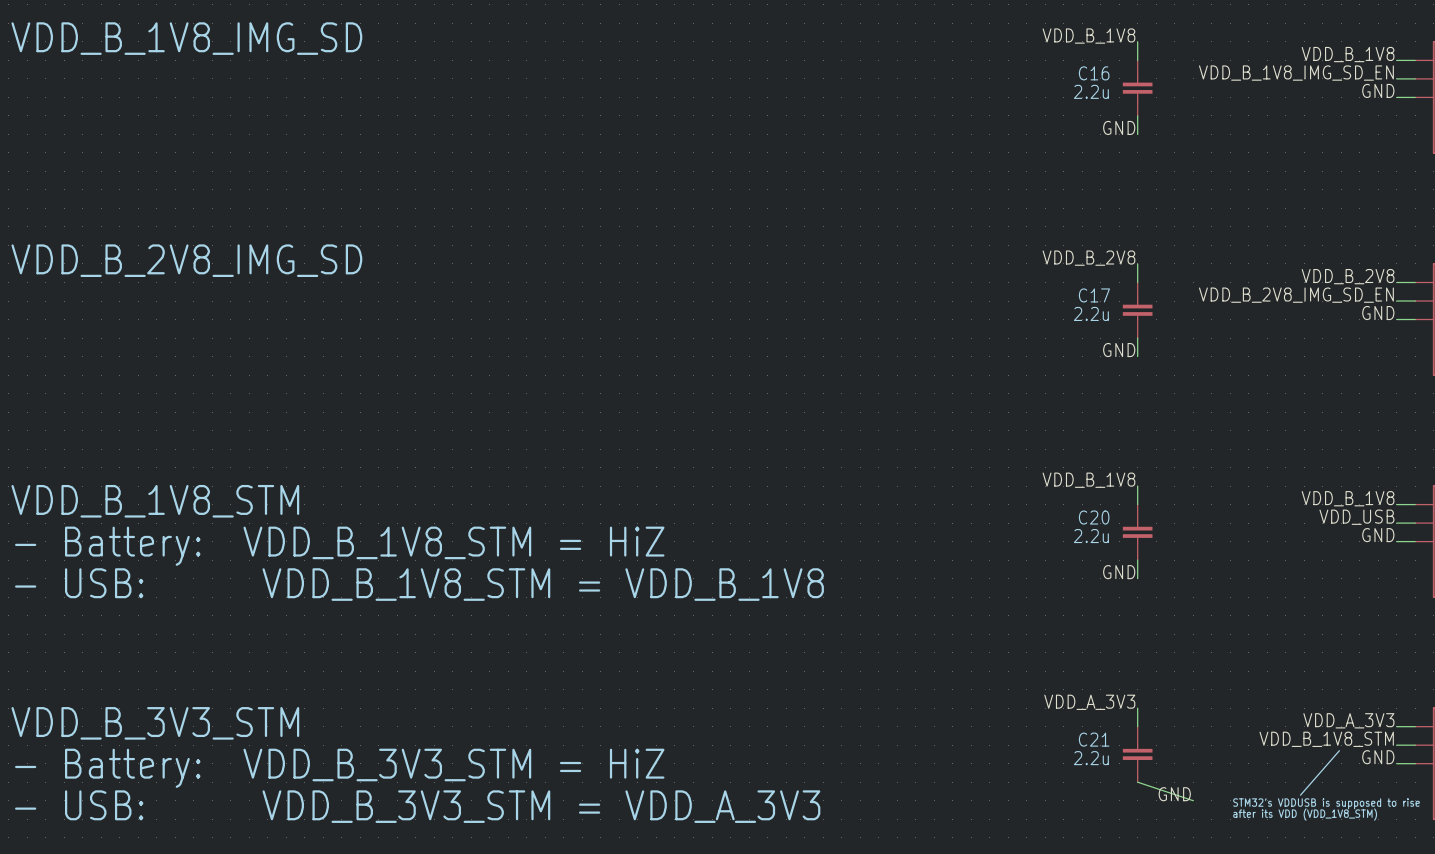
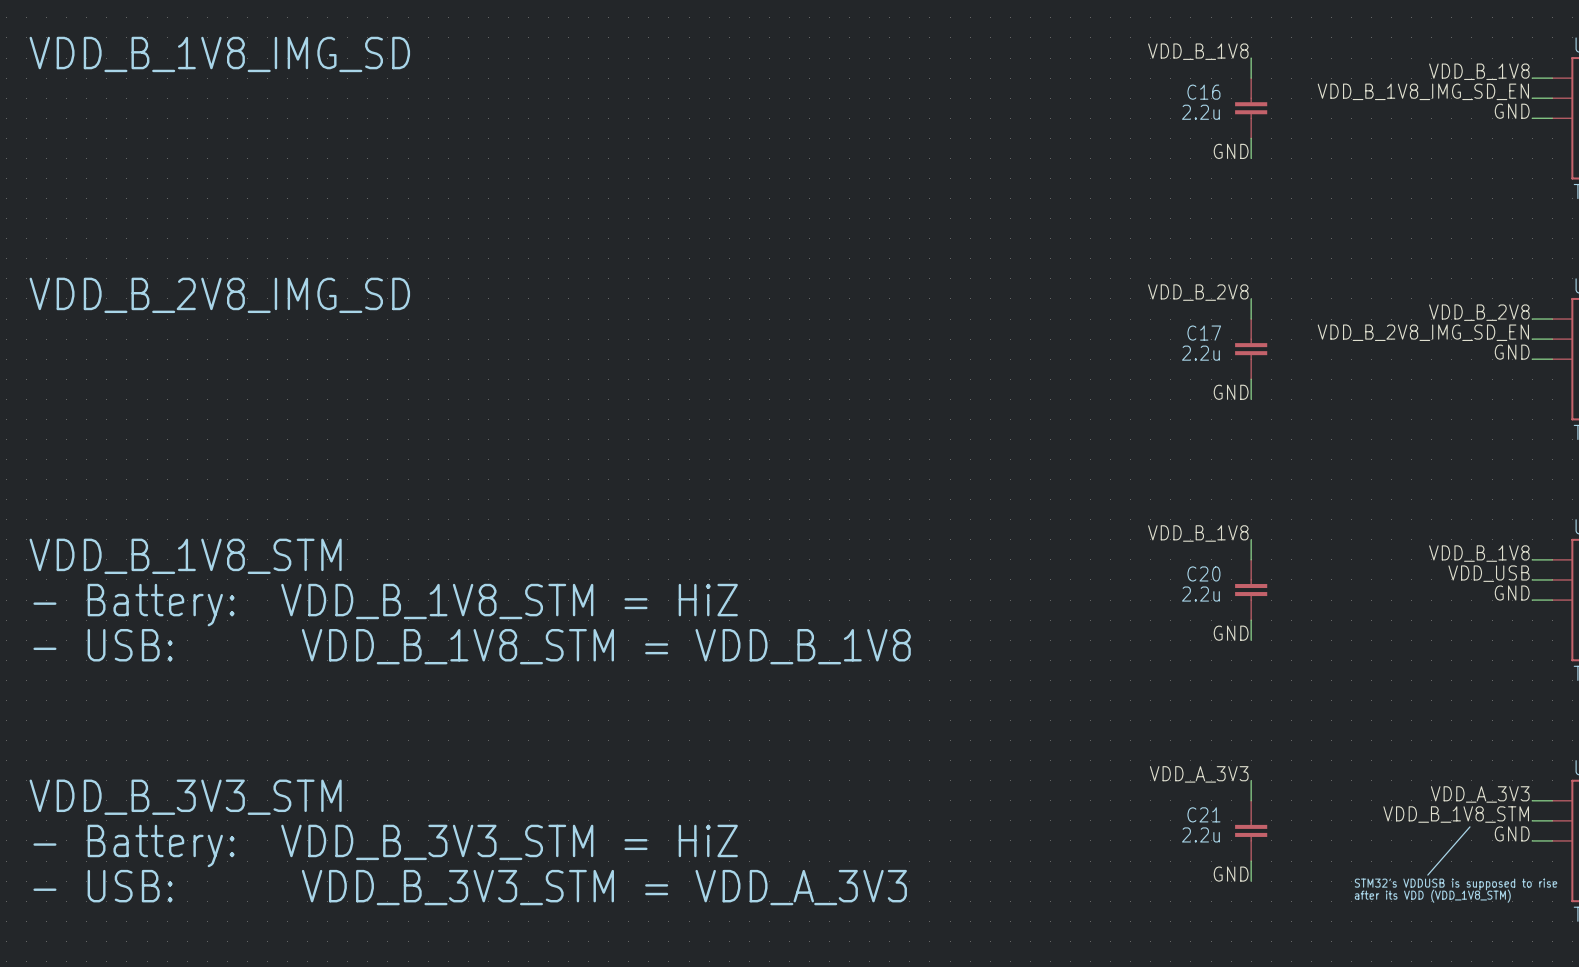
wire: (1137, 782) (1193, 800) -> (1251, 861) (1251, 881)
label position: GND (1174, 794) -> GND (1231, 874)

